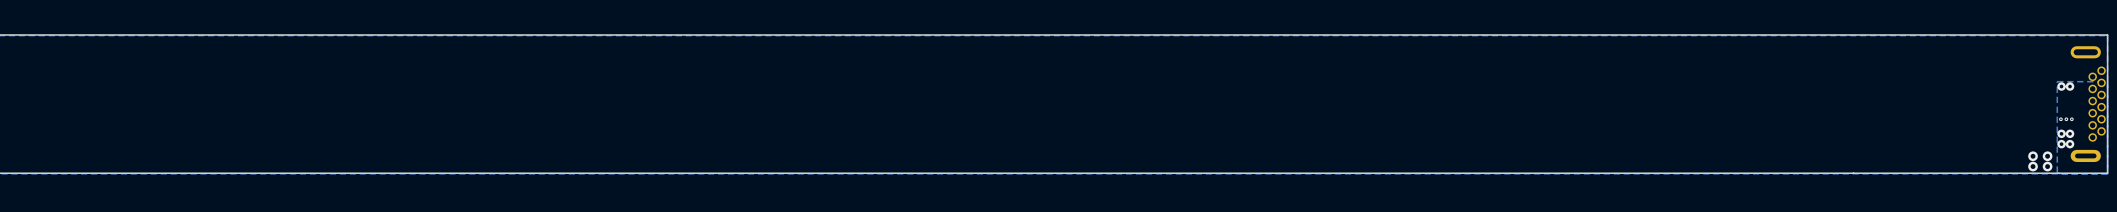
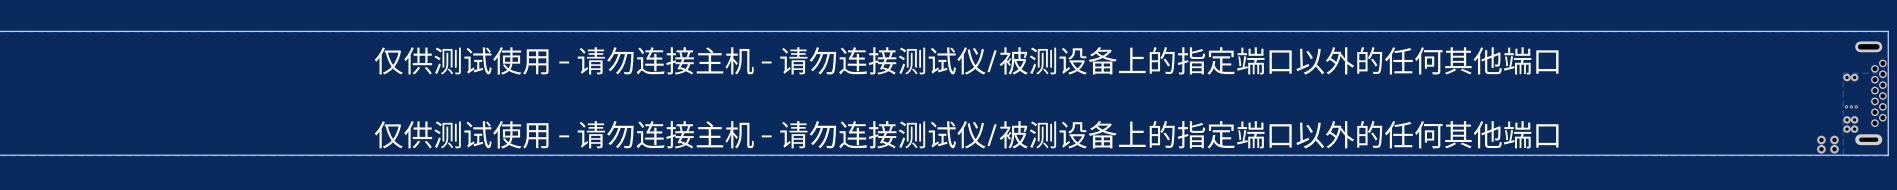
text: none -> 仅供测试使用 - 请勿连接主机 - 请勿连接测试仪/被测设备上的指定端口以外的任何其他端口 (966, 60)
text: none -> 仅供测试使用 - 请勿连接主机 - 请勿连接测试仪/被测设备上的指定端口以外的任何其他端口 (966, 134)

